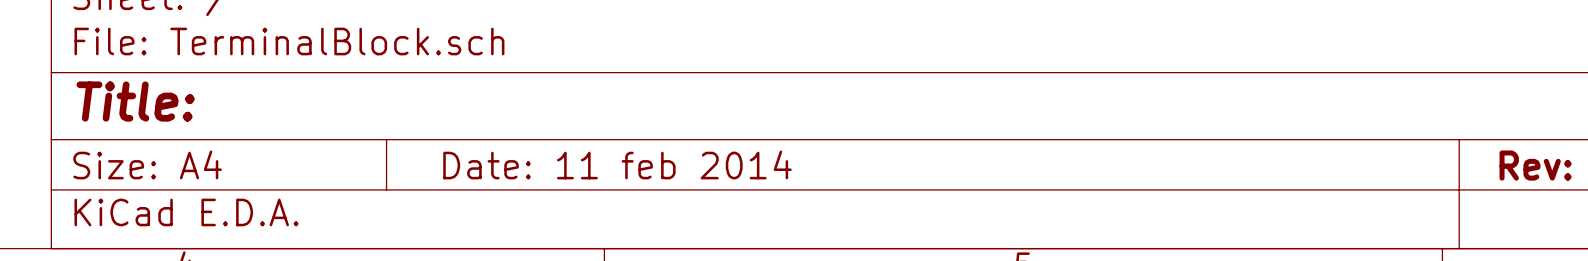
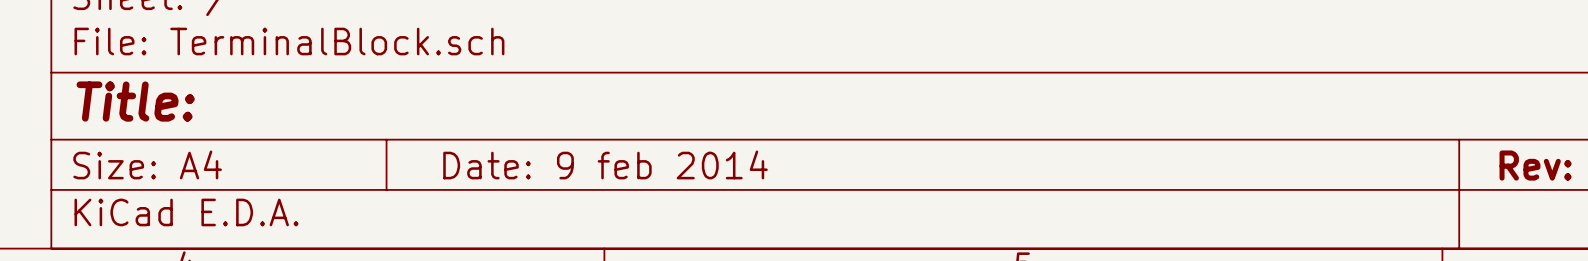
title block: Date: 11 feb 2014 (617, 164) -> Date: 9 feb 2014 (605, 164)

